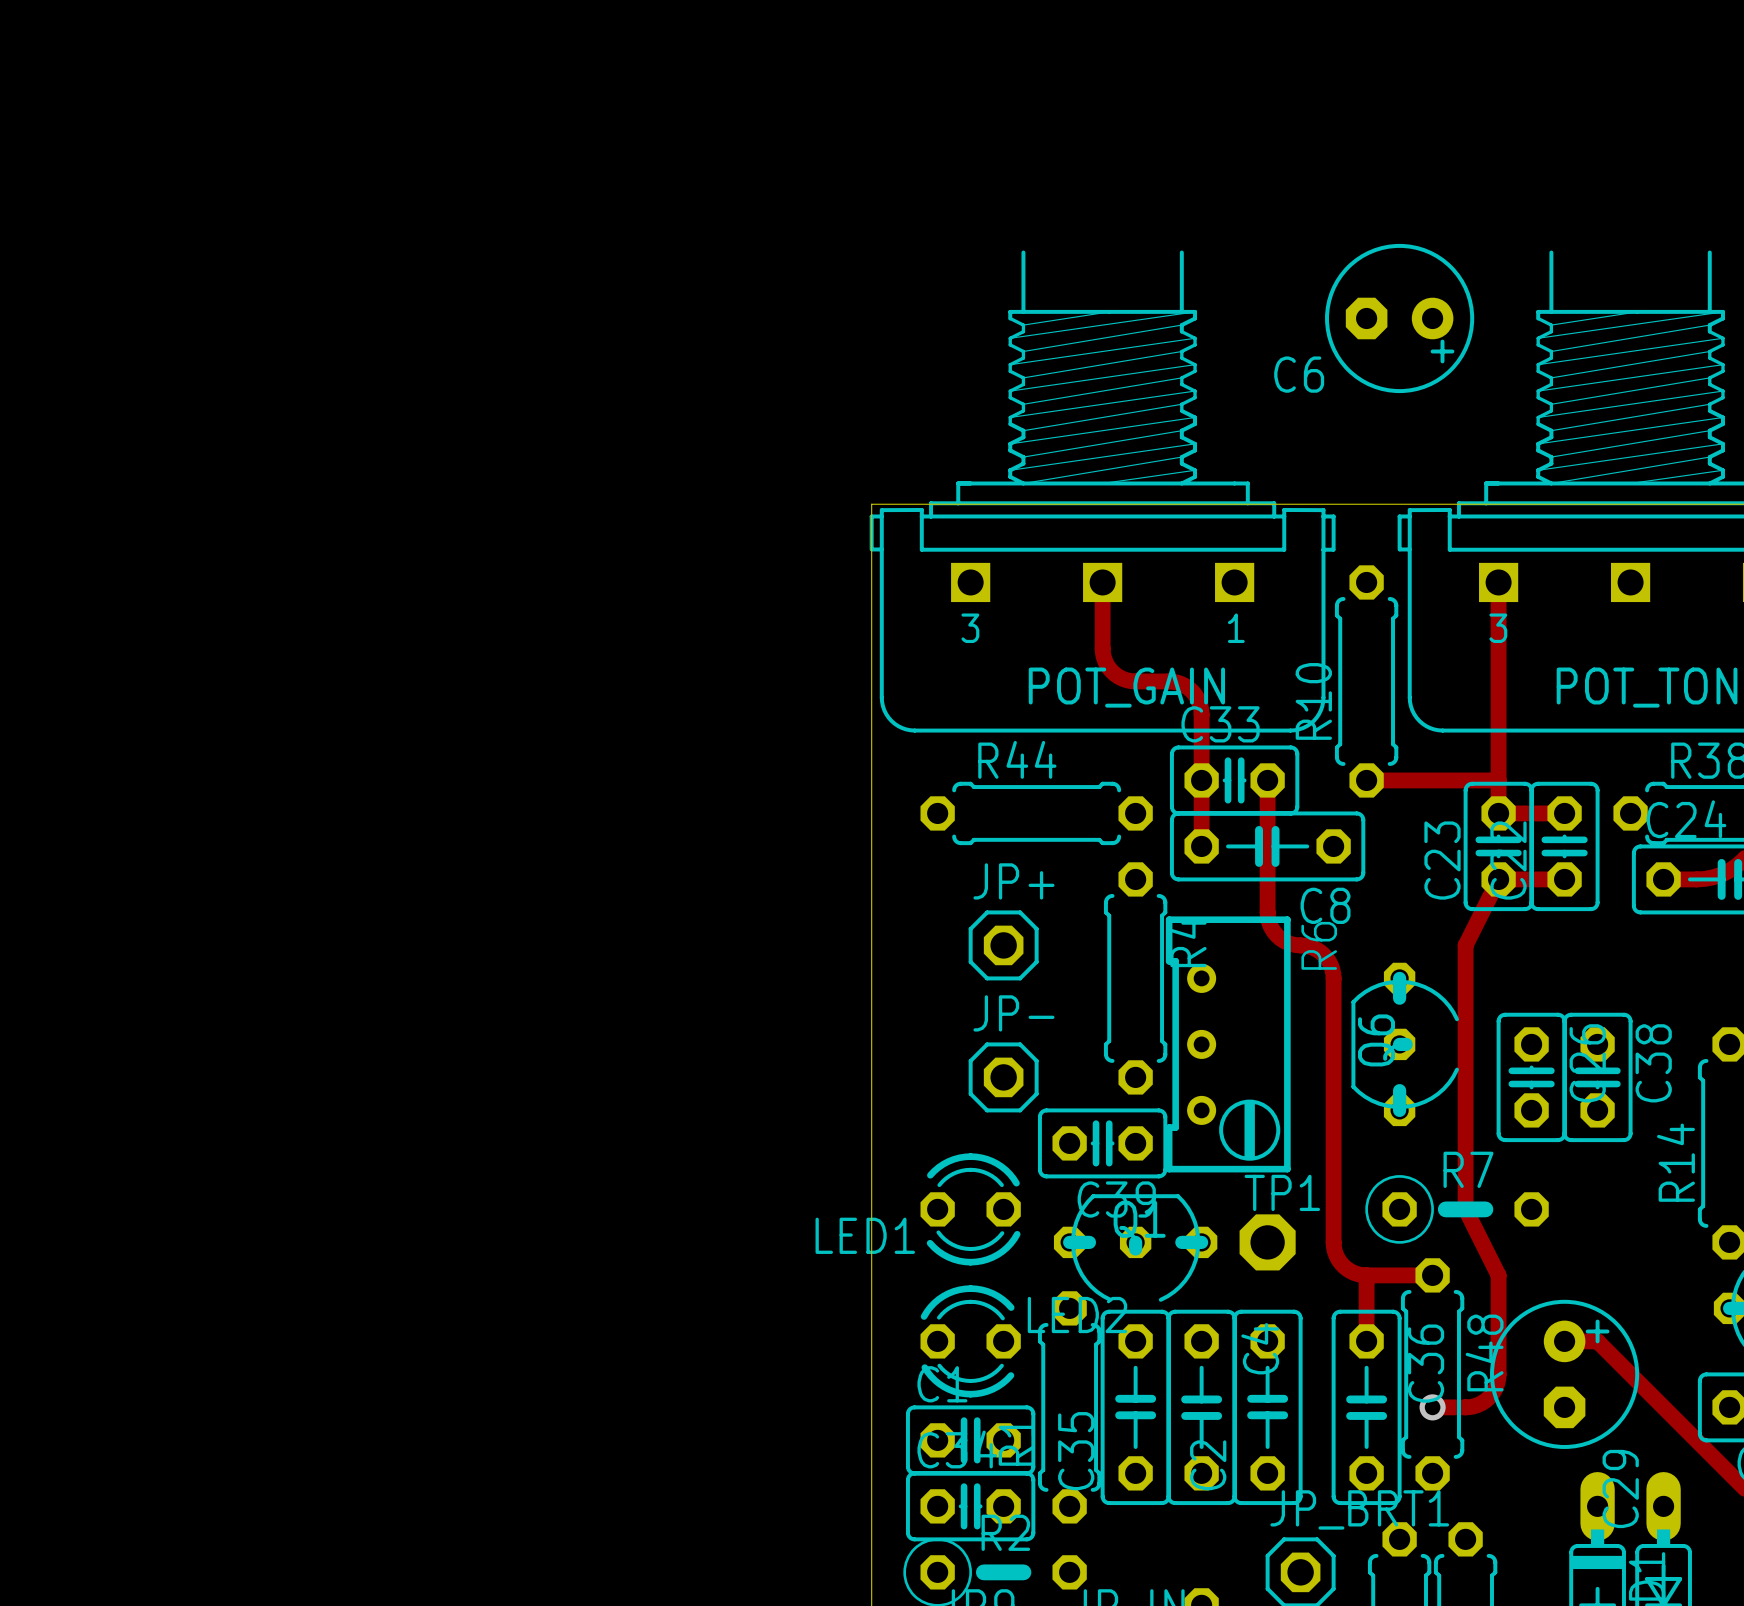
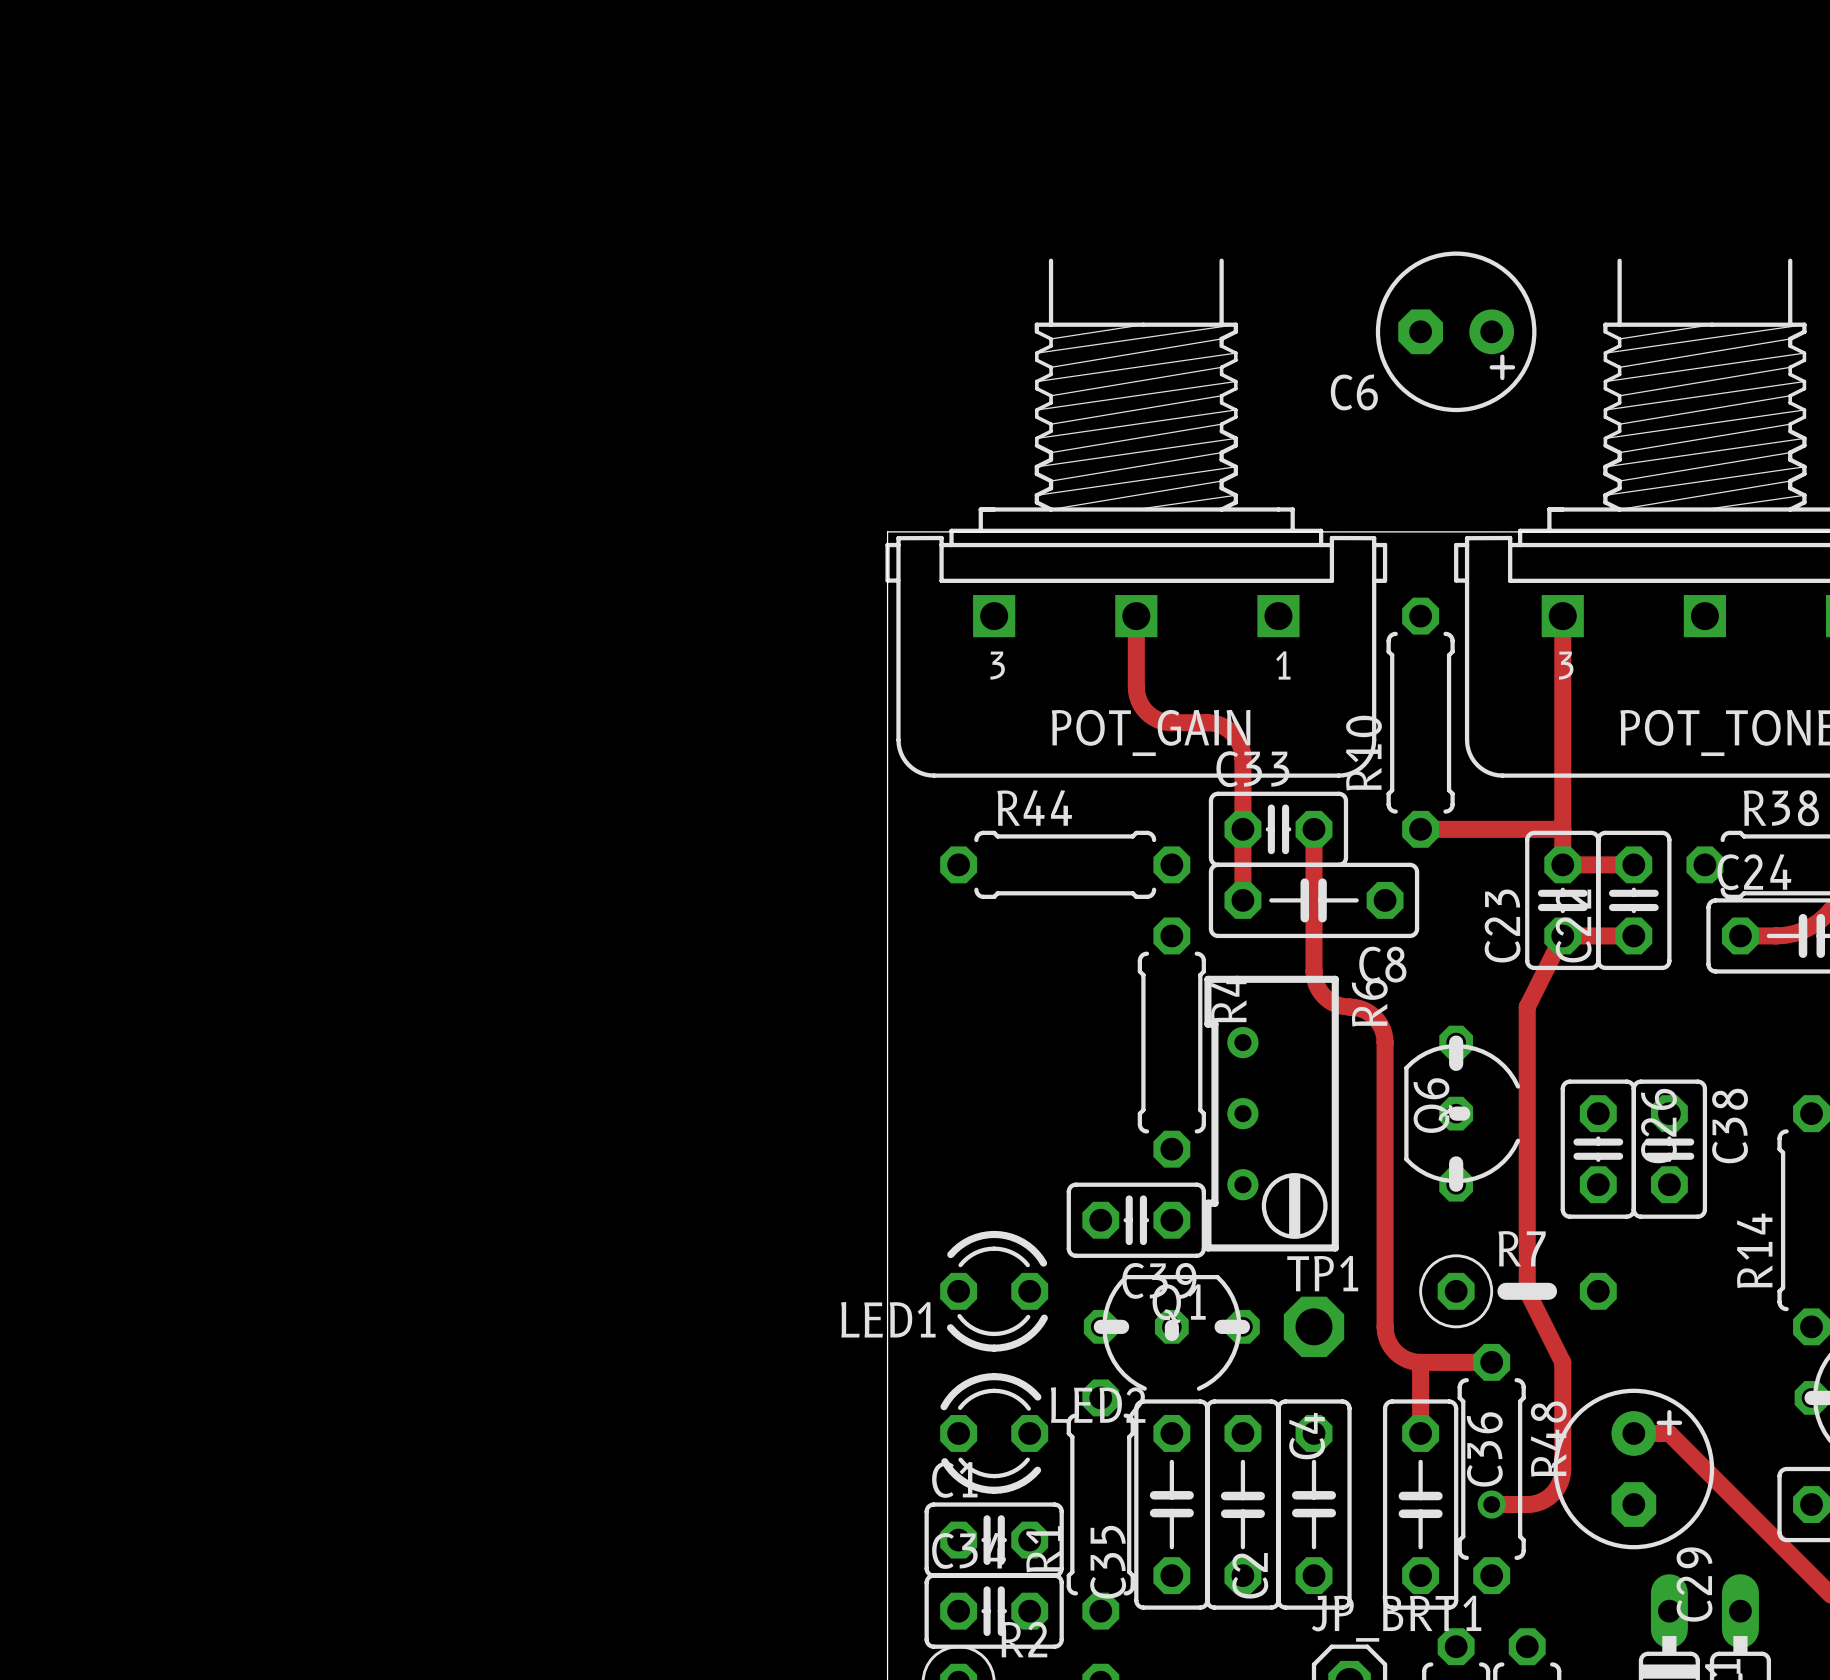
JP+: (1003, 945) -> none
JP-: (1003, 1077) -> none

